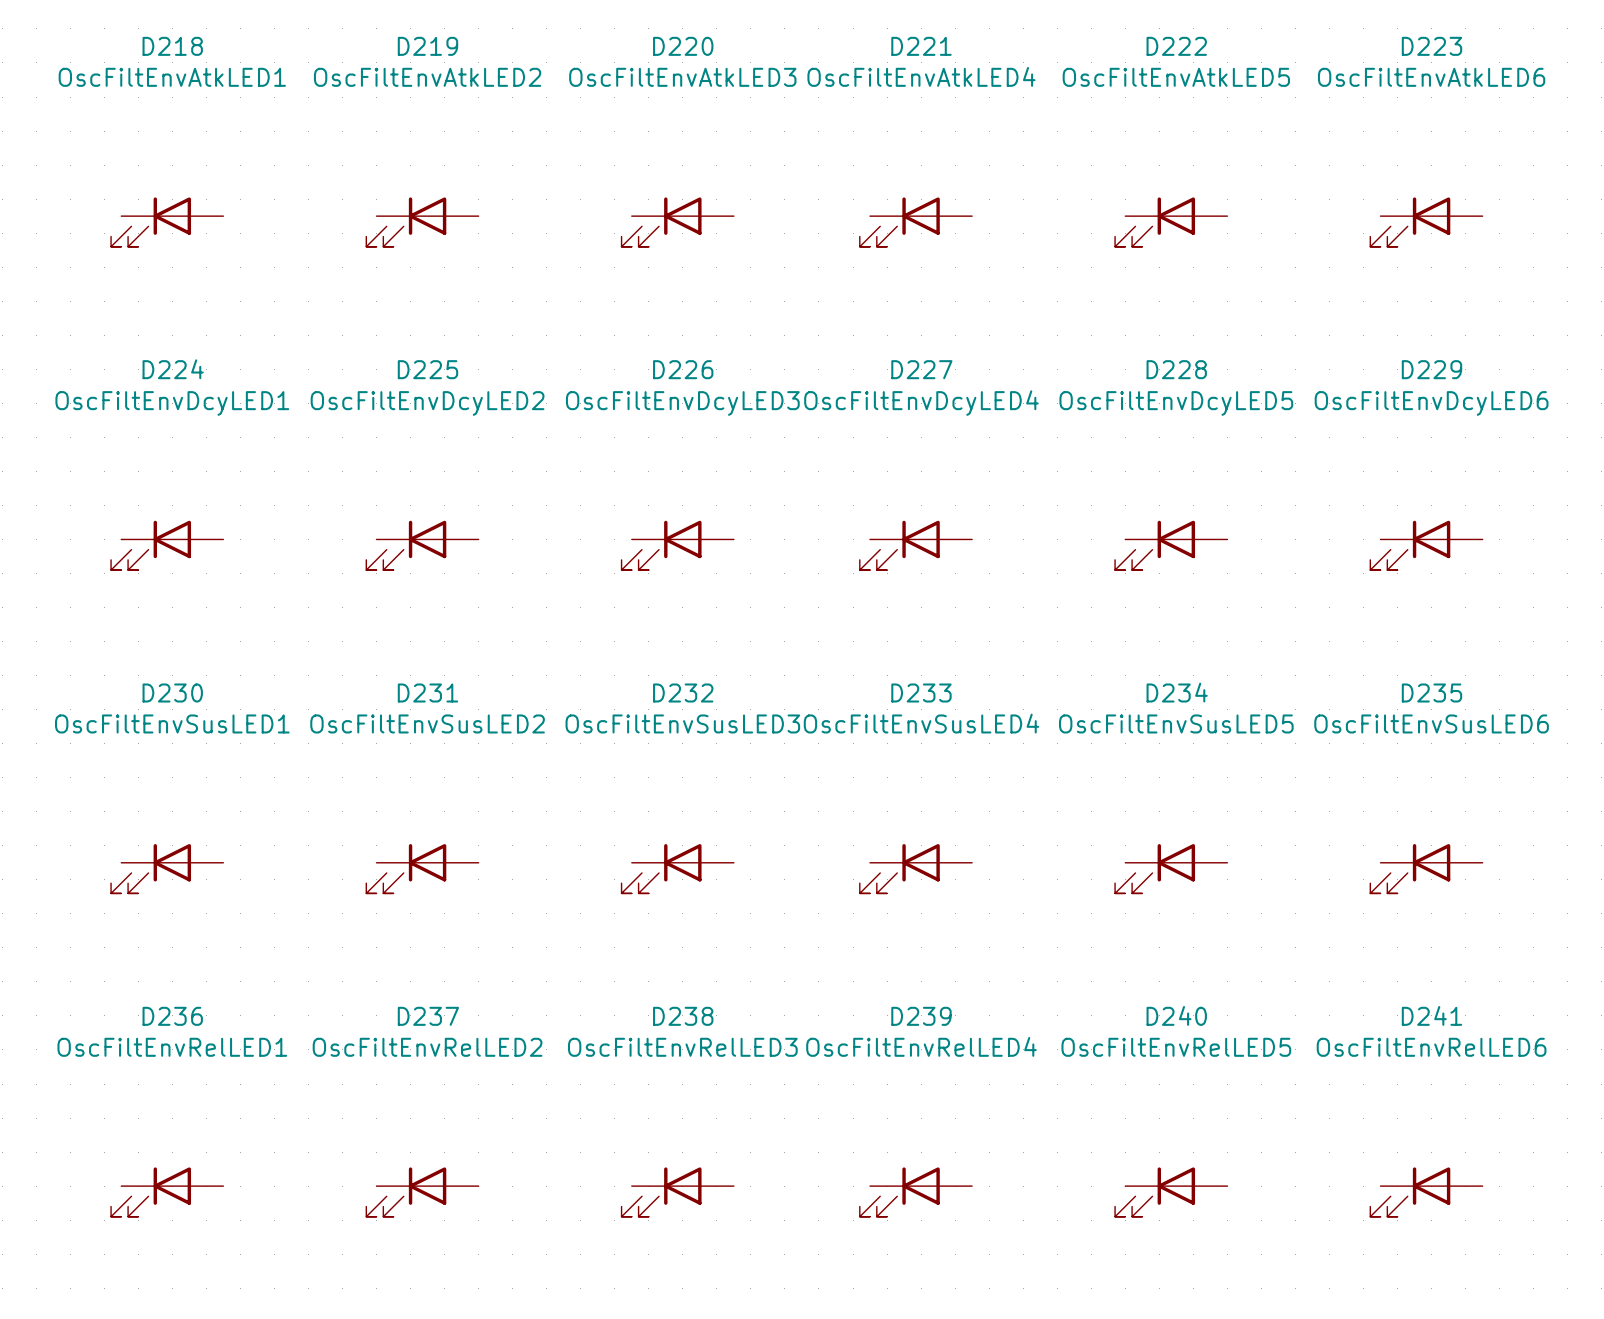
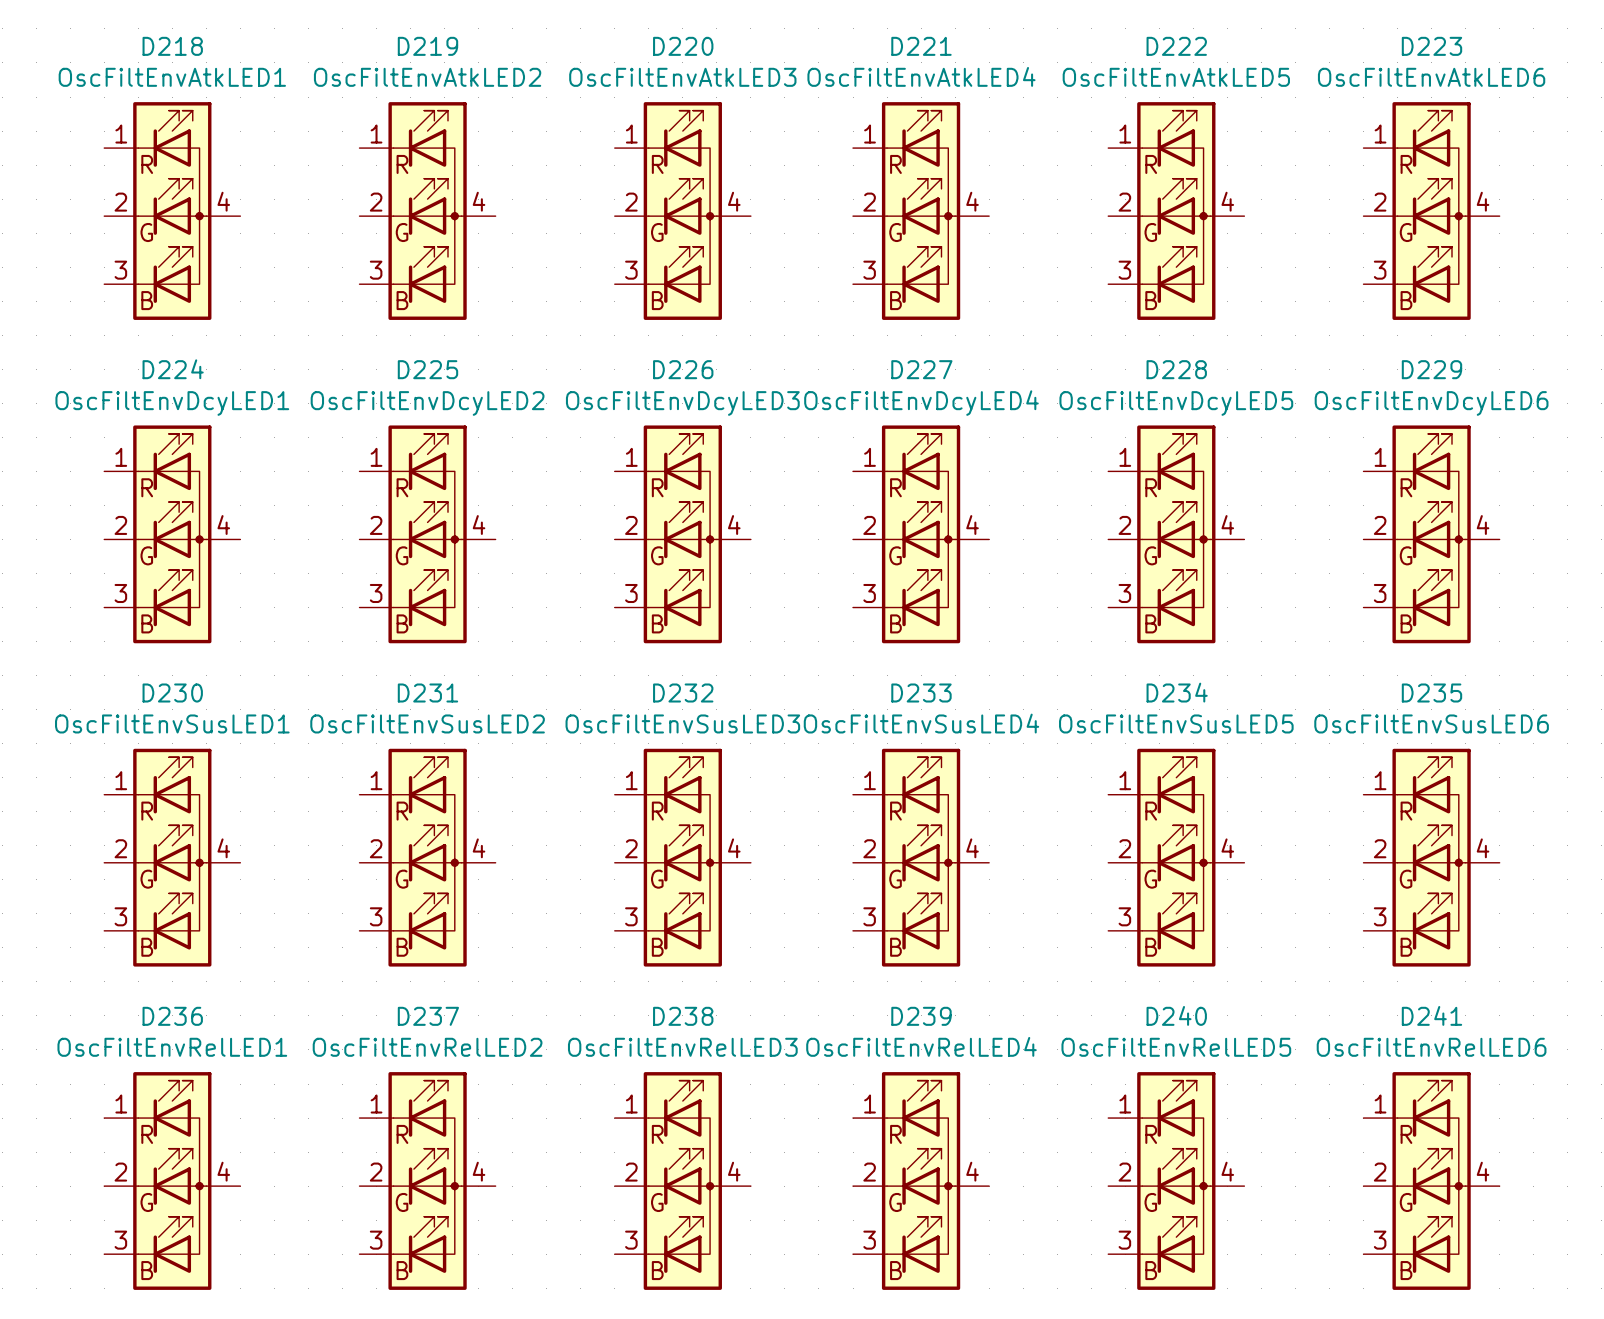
D218 symbol: [111, 197, 224, 247] -> [104, 102, 241, 320]
D219 symbol: [366, 197, 479, 247] -> [359, 102, 496, 320]
D220 symbol: [621, 197, 734, 247] -> [614, 102, 751, 320]
D221 symbol: [859, 197, 973, 247] -> [853, 102, 990, 320]
D222 symbol: [1115, 197, 1228, 247] -> [1108, 102, 1245, 320]
D223 symbol: [1370, 197, 1483, 247] -> [1363, 102, 1500, 320]
D224 symbol: [111, 520, 224, 571] -> [104, 425, 241, 644]
D225 symbol: [366, 520, 479, 571] -> [359, 425, 496, 644]
D226 symbol: [621, 520, 734, 571] -> [614, 425, 751, 644]
D227 symbol: [859, 520, 973, 571] -> [853, 425, 990, 644]
D228 symbol: [1115, 520, 1228, 571] -> [1108, 425, 1245, 644]
D229 symbol: [1370, 520, 1483, 571] -> [1363, 425, 1500, 644]
D230 symbol: [111, 844, 224, 894] -> [104, 748, 241, 967]
D231 symbol: [366, 844, 479, 894] -> [359, 748, 496, 967]
D232 symbol: [621, 844, 734, 894] -> [614, 748, 751, 967]
D233 symbol: [859, 844, 973, 894] -> [853, 748, 990, 967]
D234 symbol: [1115, 844, 1228, 894] -> [1108, 748, 1245, 967]
D235 symbol: [1370, 844, 1483, 894] -> [1363, 748, 1500, 967]
D236 symbol: [111, 1167, 224, 1217] -> [104, 1072, 241, 1290]
D237 symbol: [366, 1167, 479, 1217] -> [359, 1072, 496, 1290]
D238 symbol: [621, 1167, 734, 1217] -> [614, 1072, 751, 1290]
D239 symbol: [859, 1167, 973, 1217] -> [853, 1072, 990, 1290]
D240 symbol: [1115, 1167, 1228, 1217] -> [1108, 1072, 1245, 1290]
D241 symbol: [1370, 1167, 1483, 1217] -> [1363, 1072, 1500, 1290]

